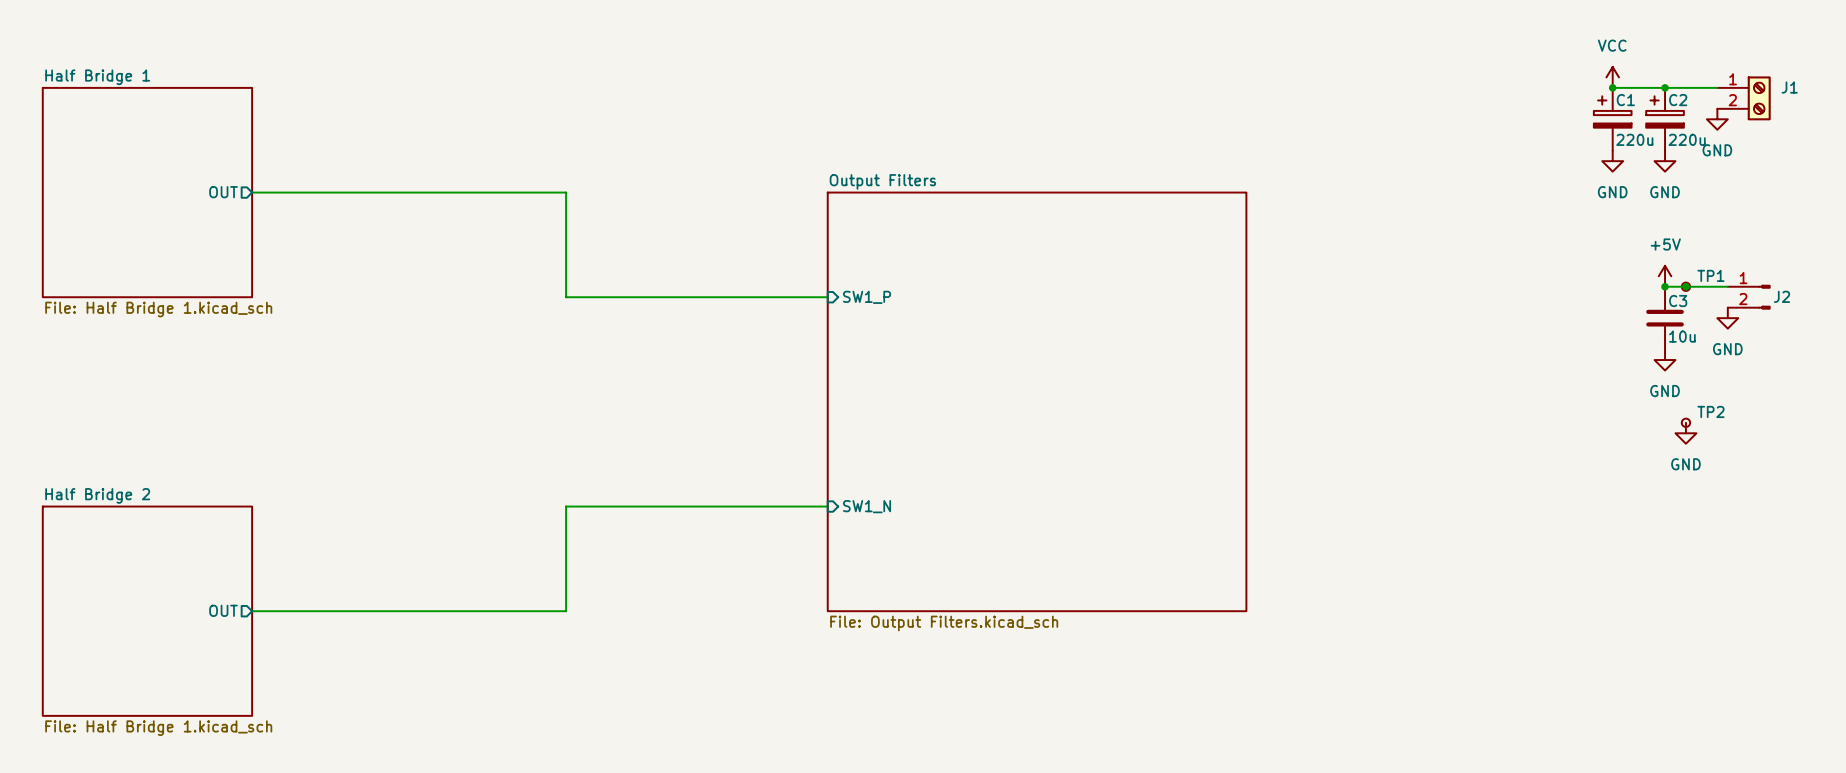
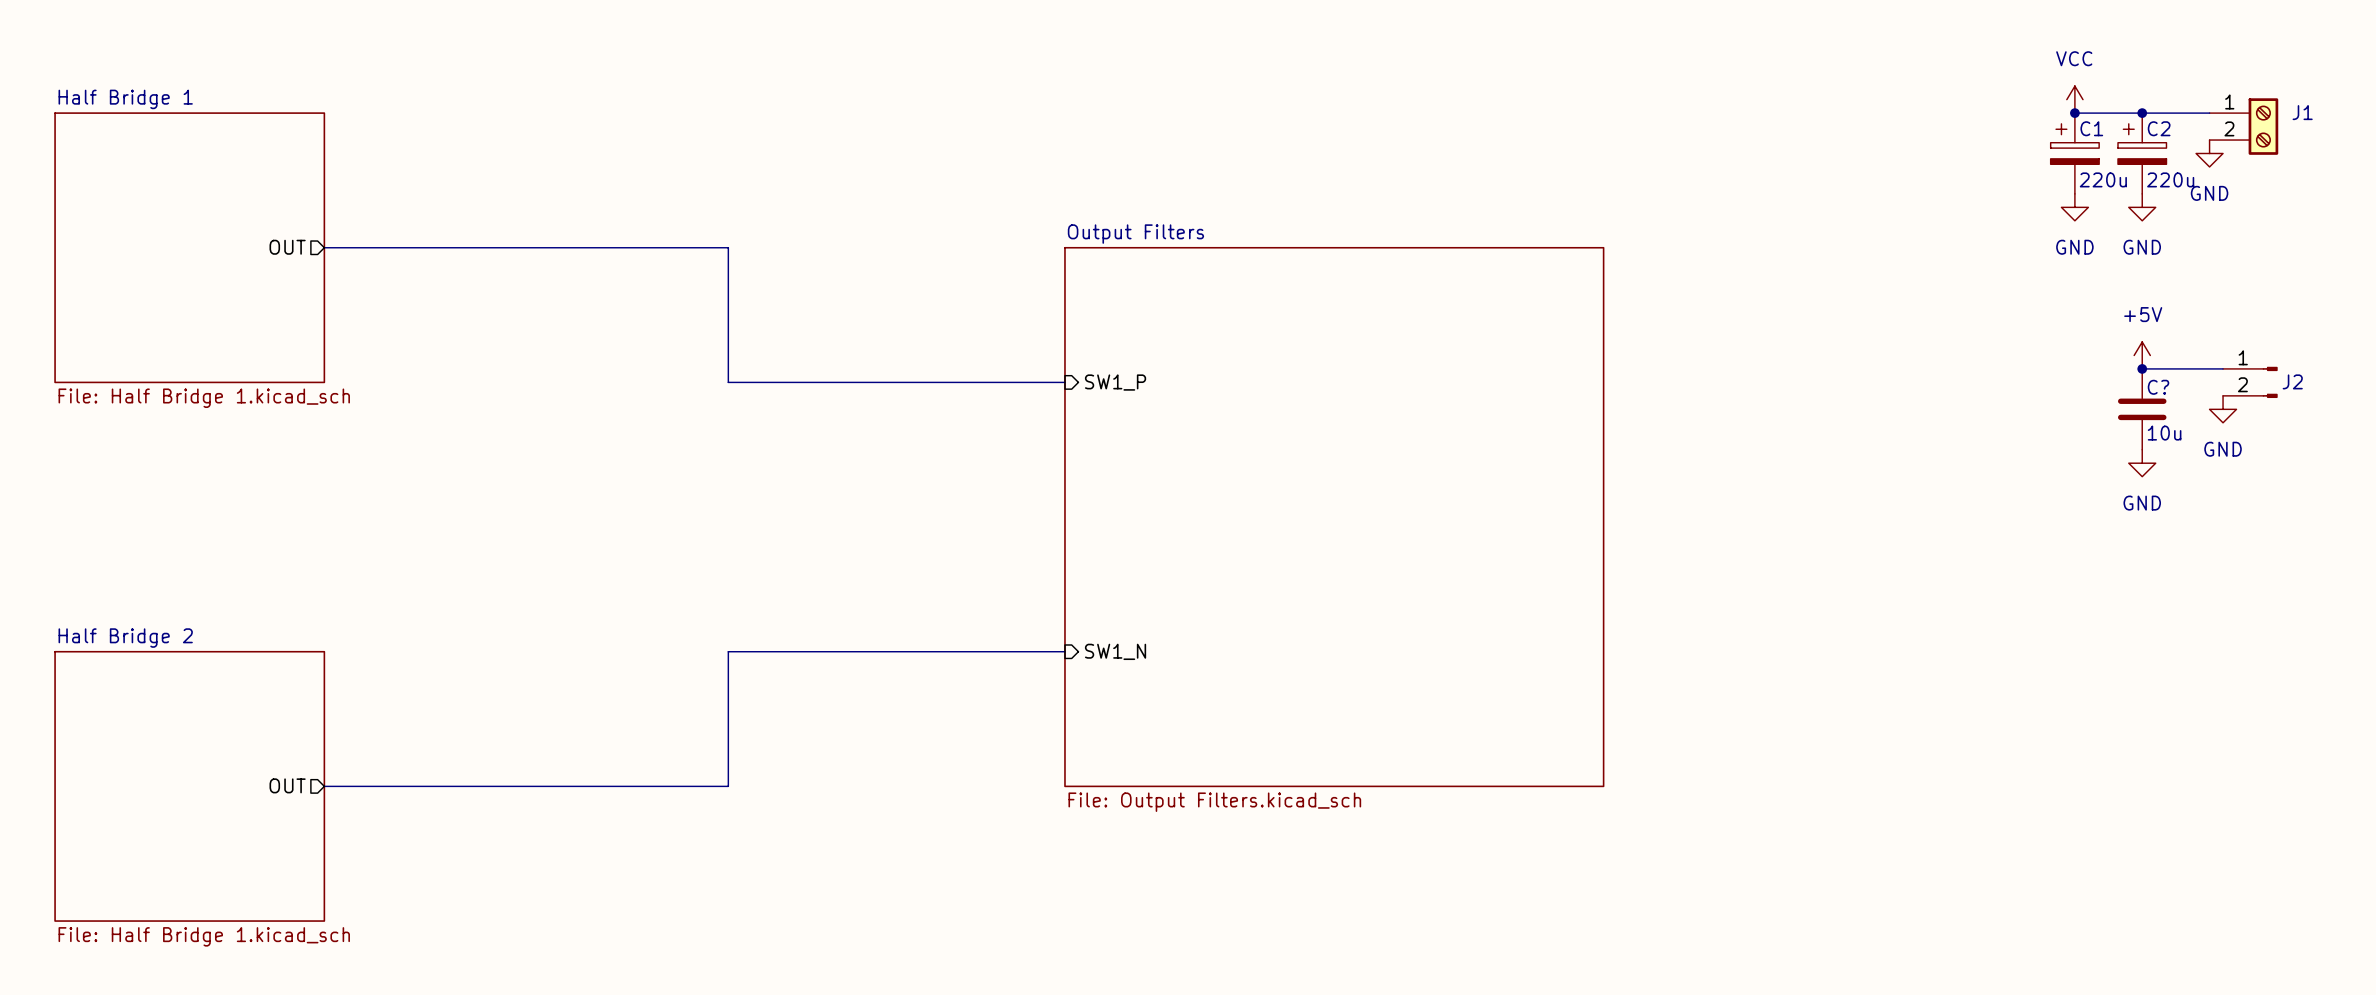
junction: (1685, 286) -> none
TP1: (1685, 286) -> none
C3 name: C3 (1678, 301) -> C? (2158, 387)
TP2: (1685, 422) -> none
power symbol: GND (1685, 433) -> none

